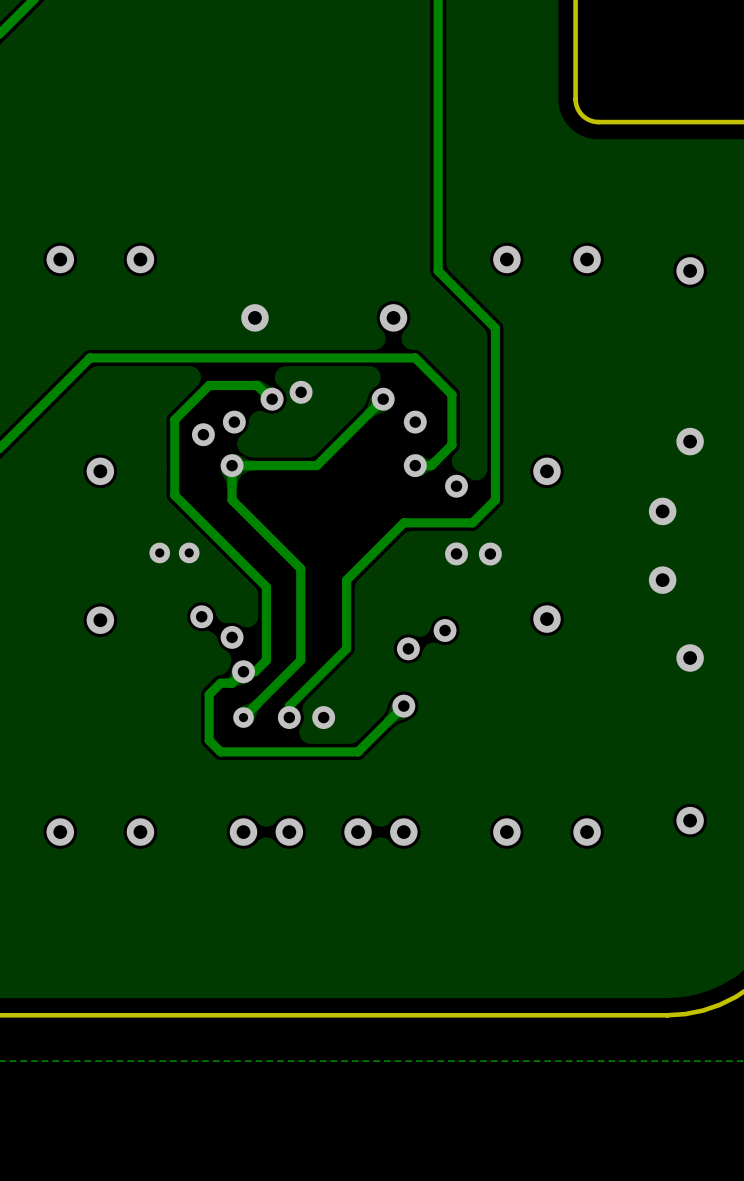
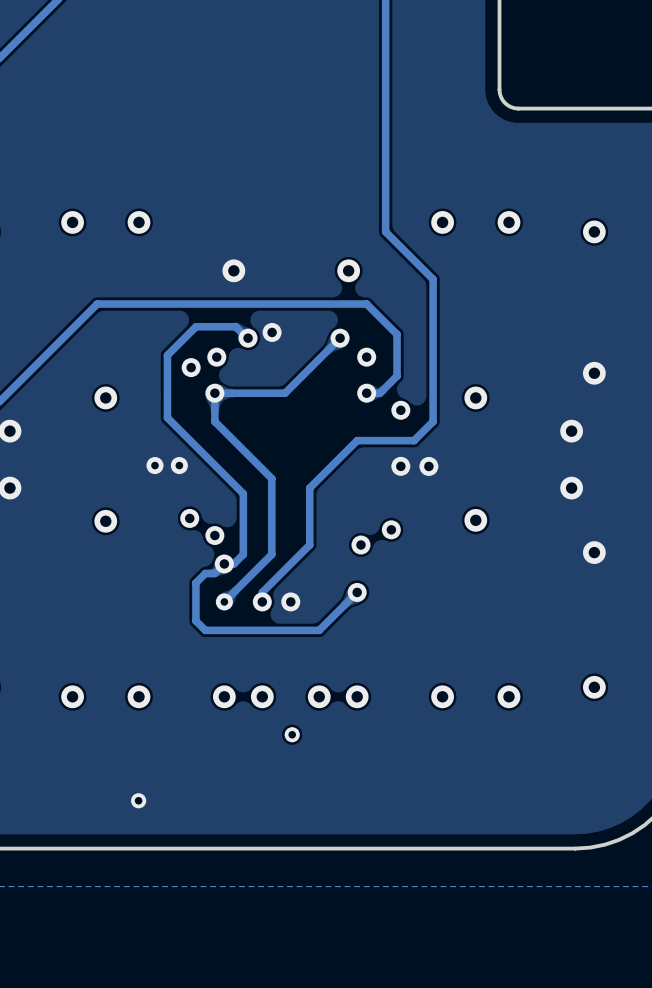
via: none -> (292, 734)
via: none -> (138, 800)

